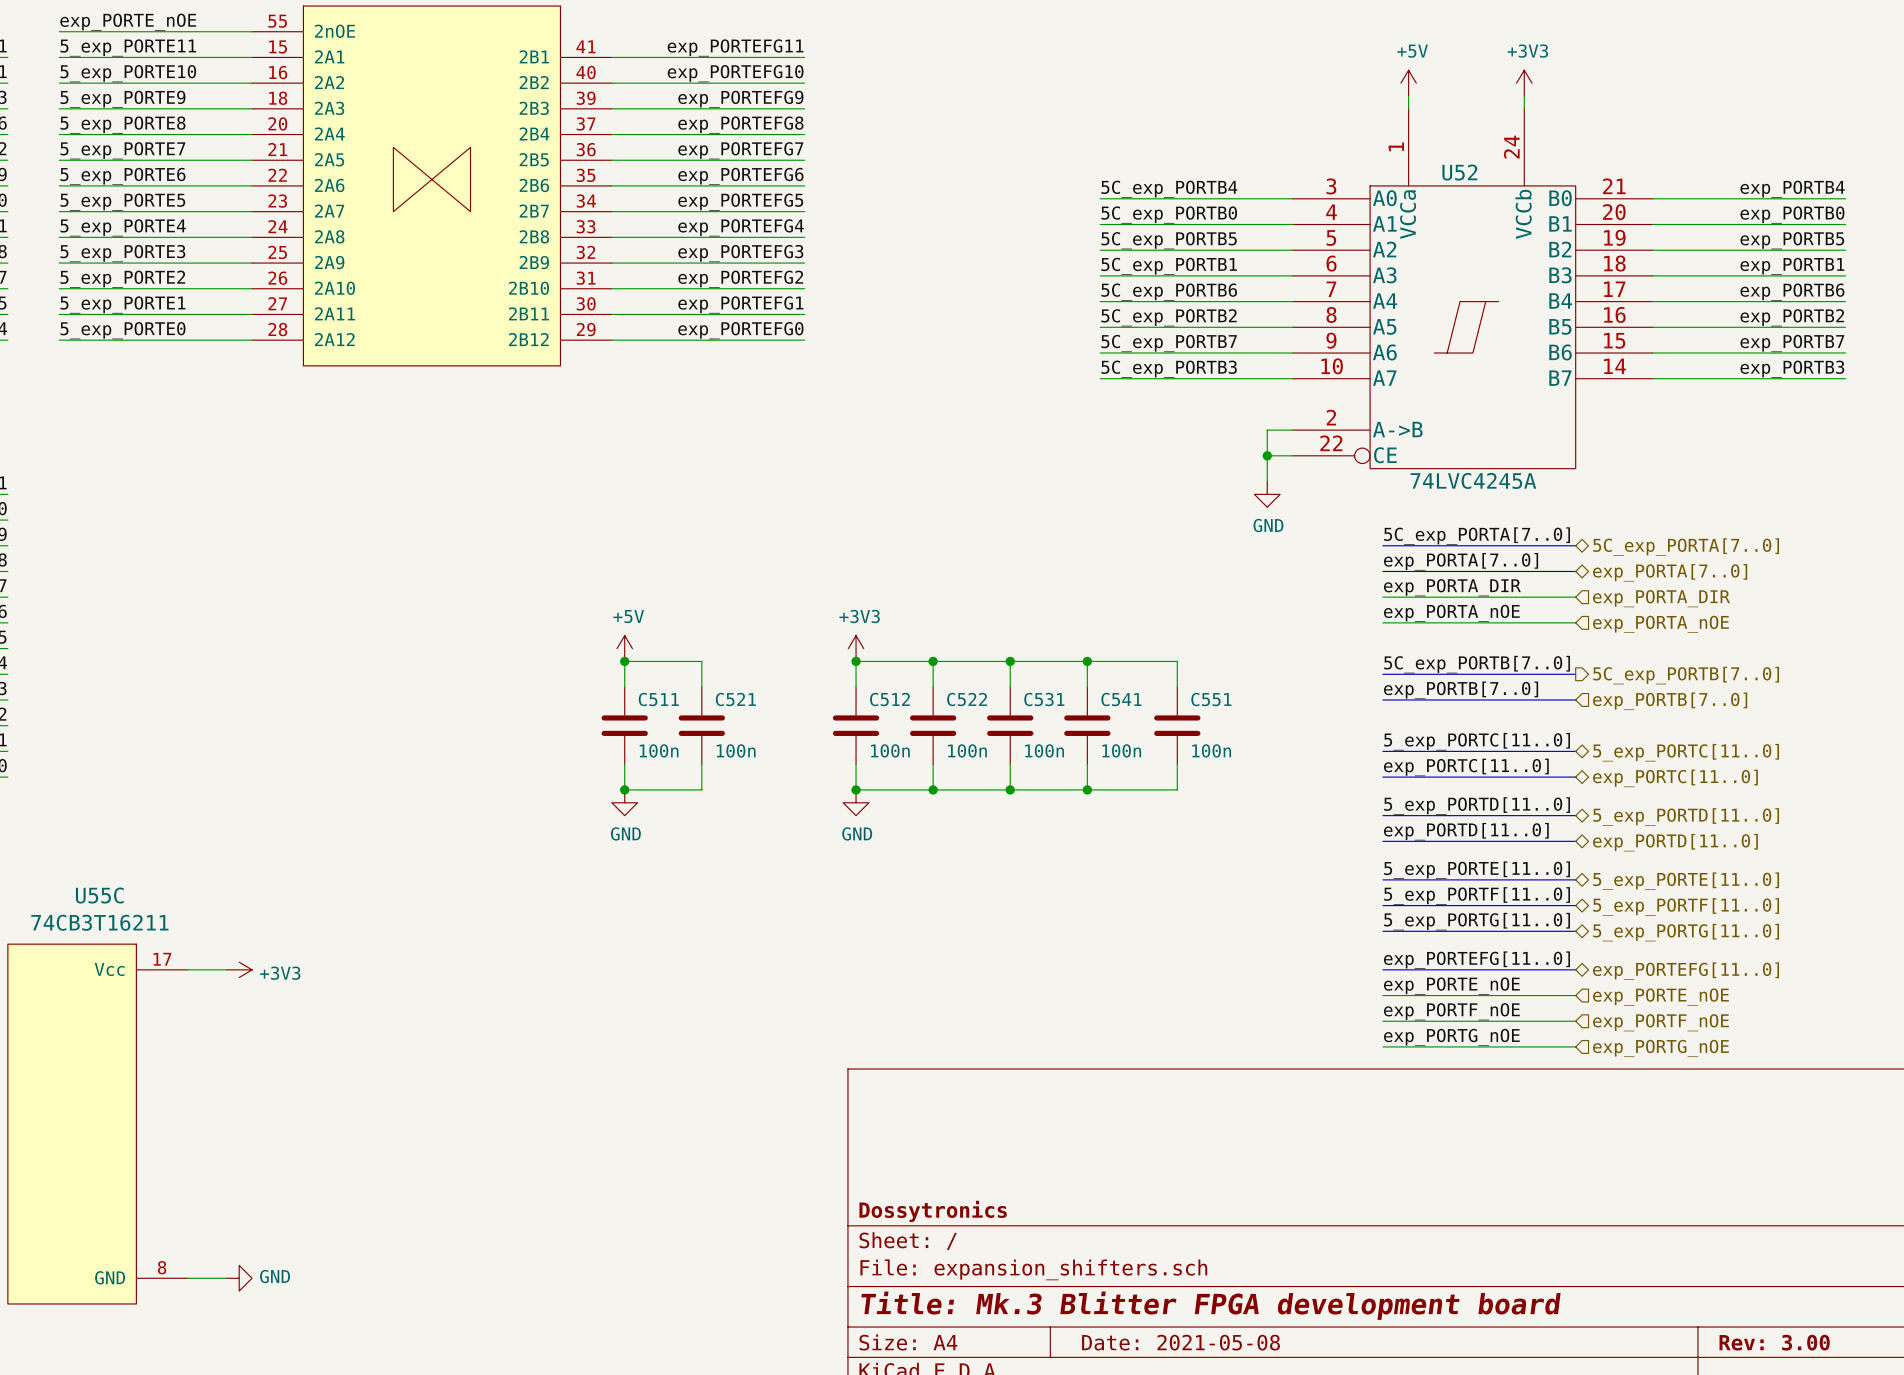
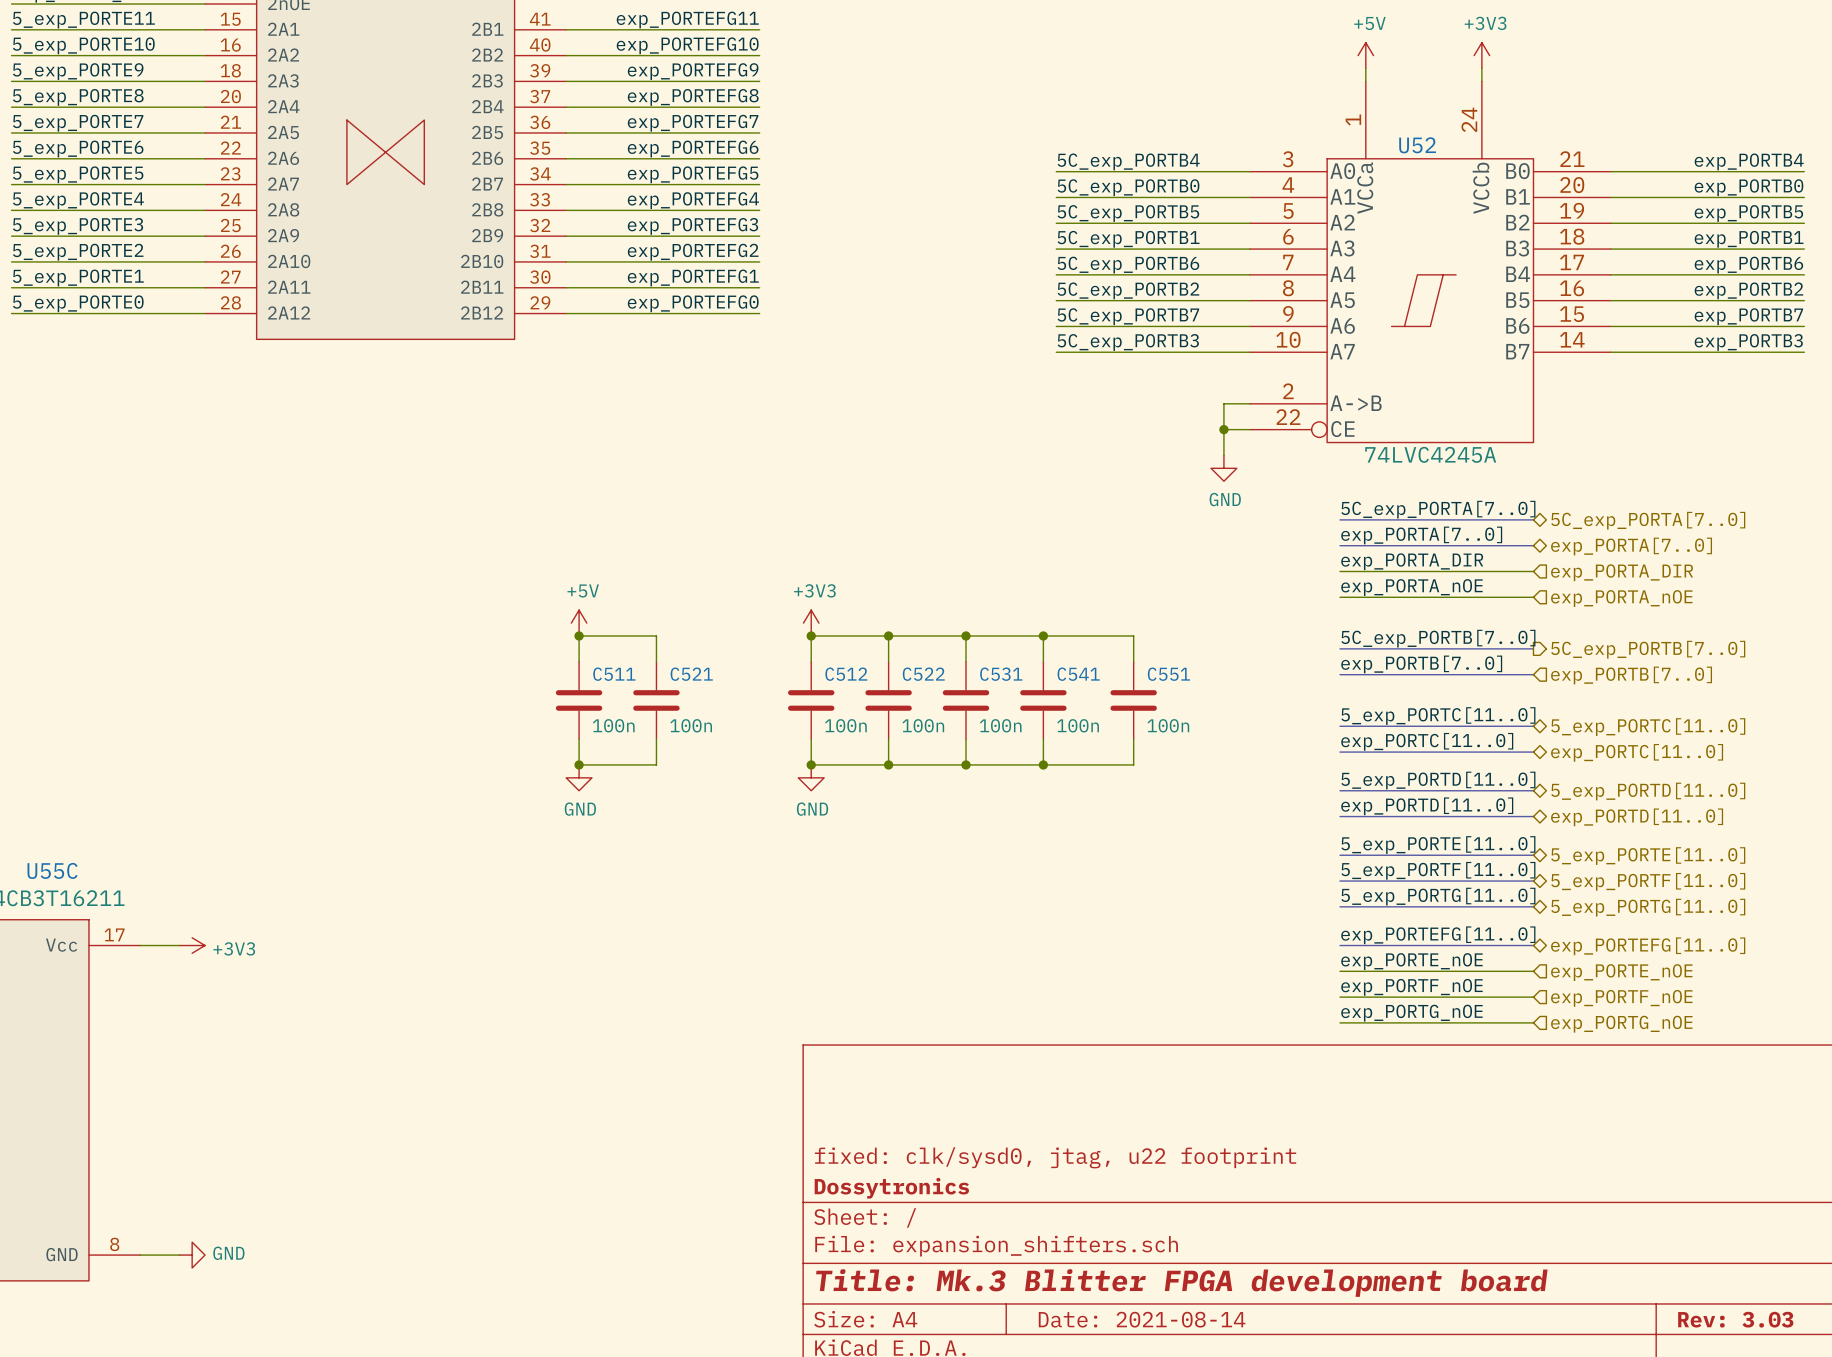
title block: none -> fixed: clk/sysd0, jtag, u22 footprint (1055, 1157)
title block: Date: 2021-05-08 (1180, 1342) -> Date: 2021-08-14 (1142, 1319)
title block: Rev: 3.00 (1774, 1342) -> Rev: 3.03 (1735, 1319)

